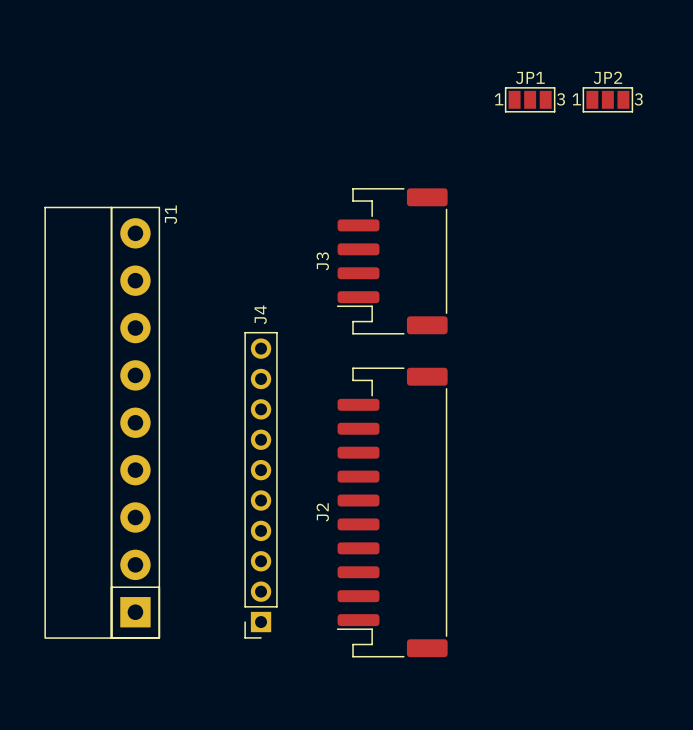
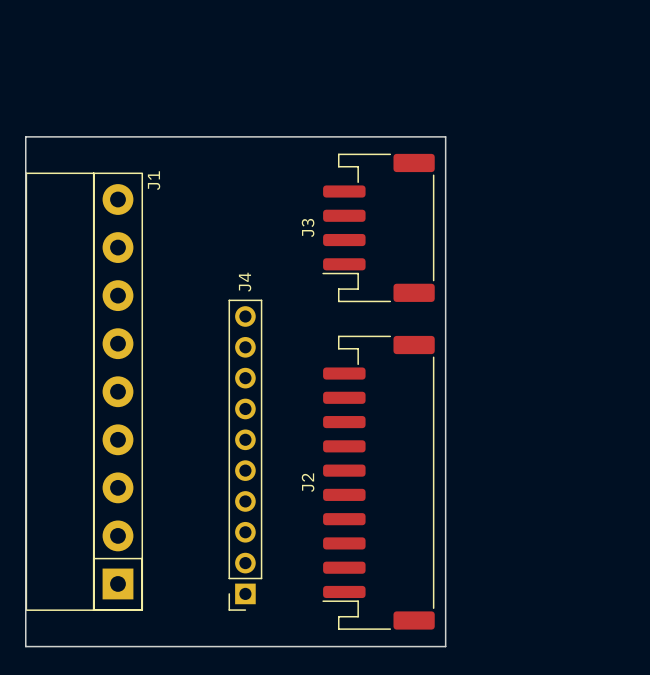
JP1: (530, 99) -> none
JP2: (607, 99) -> none
board edge: none -> (25, 136) (445, 136) (445, 646) (25, 646) (25, 136)

